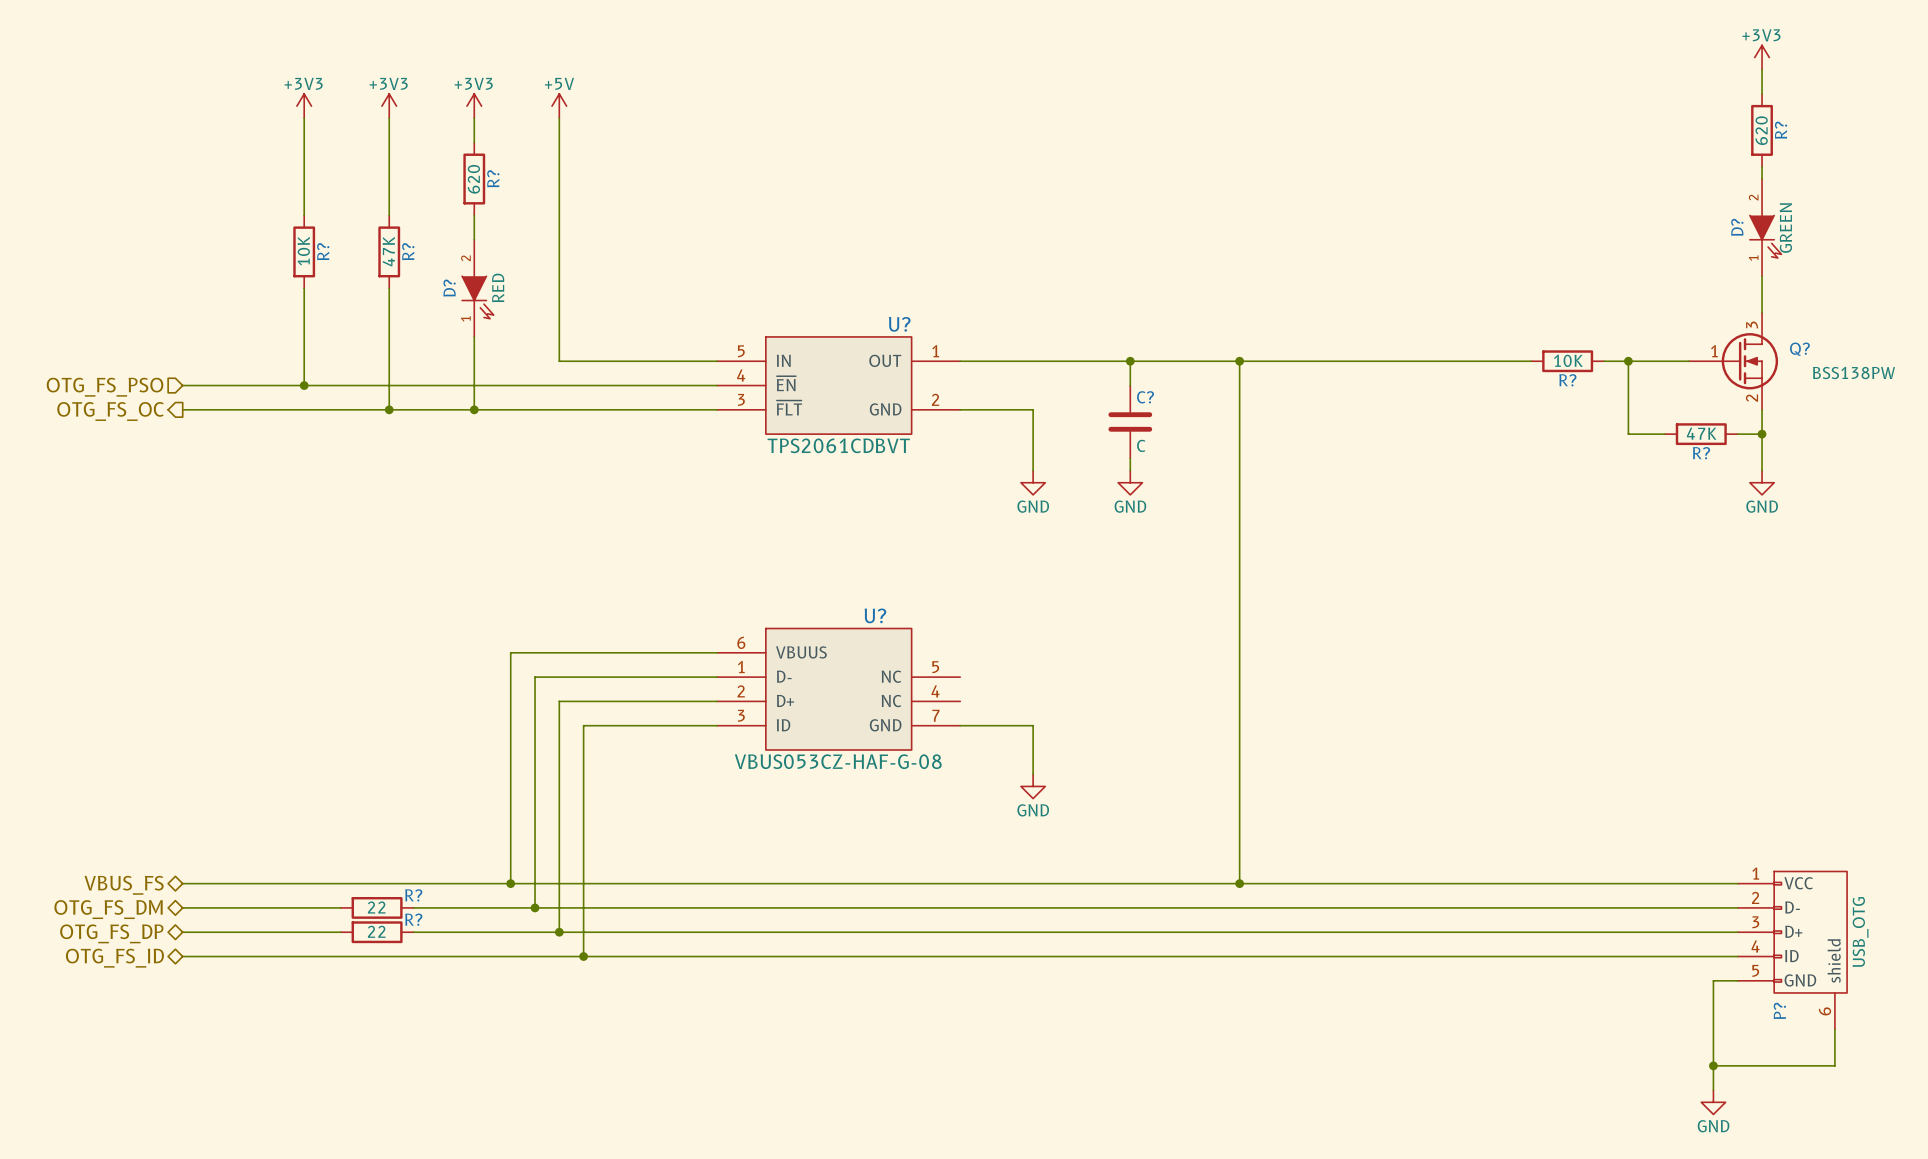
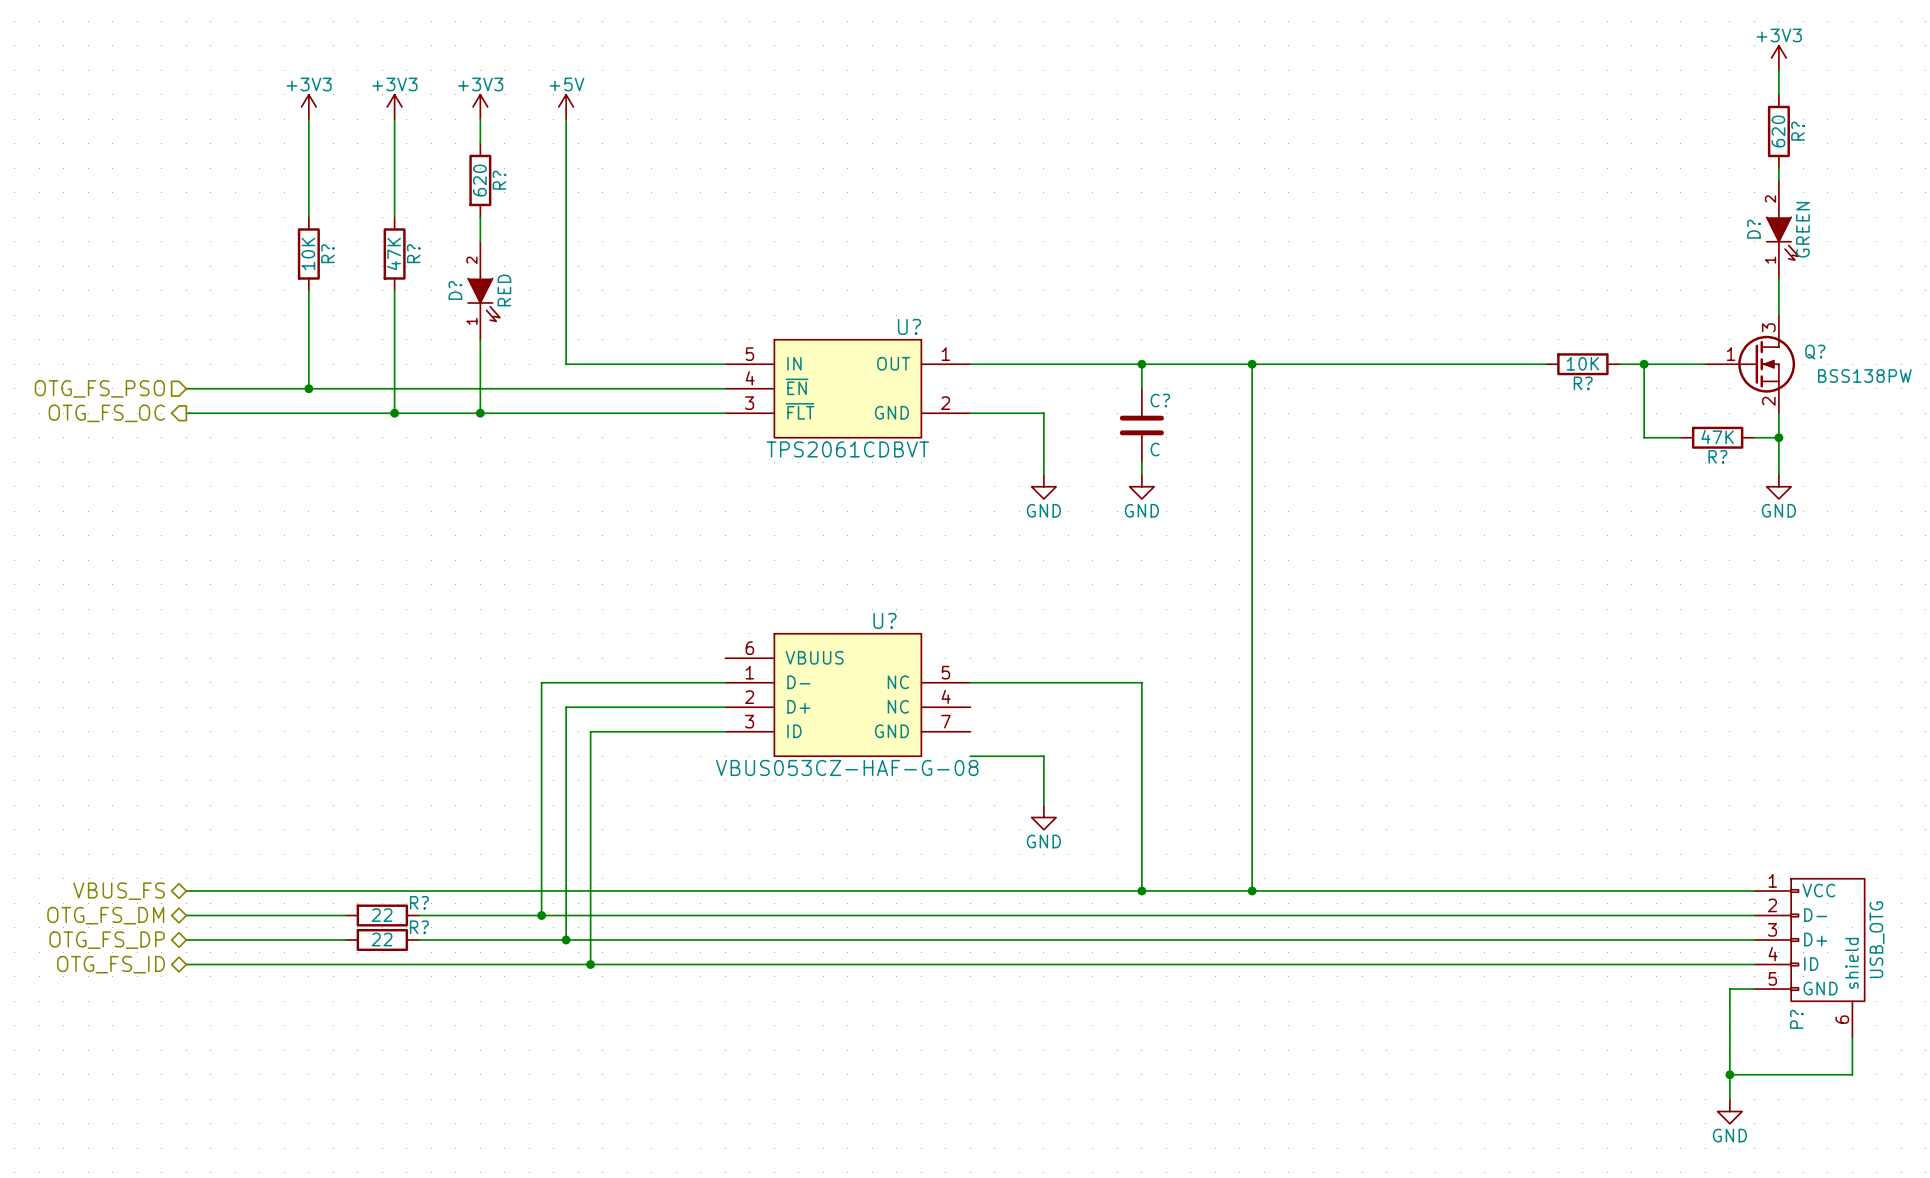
wire: (717, 652) (510, 652) (510, 883) -> none
wire: none -> (970, 682) (1141, 682) (1141, 891)
wire: (960, 725) (1033, 725) (1033, 750) -> (970, 756) (1043, 756)
power symbol position: GND (1033, 786) -> GND (1043, 817)
junction: (510, 883) -> none
junction: none -> (1141, 891)

